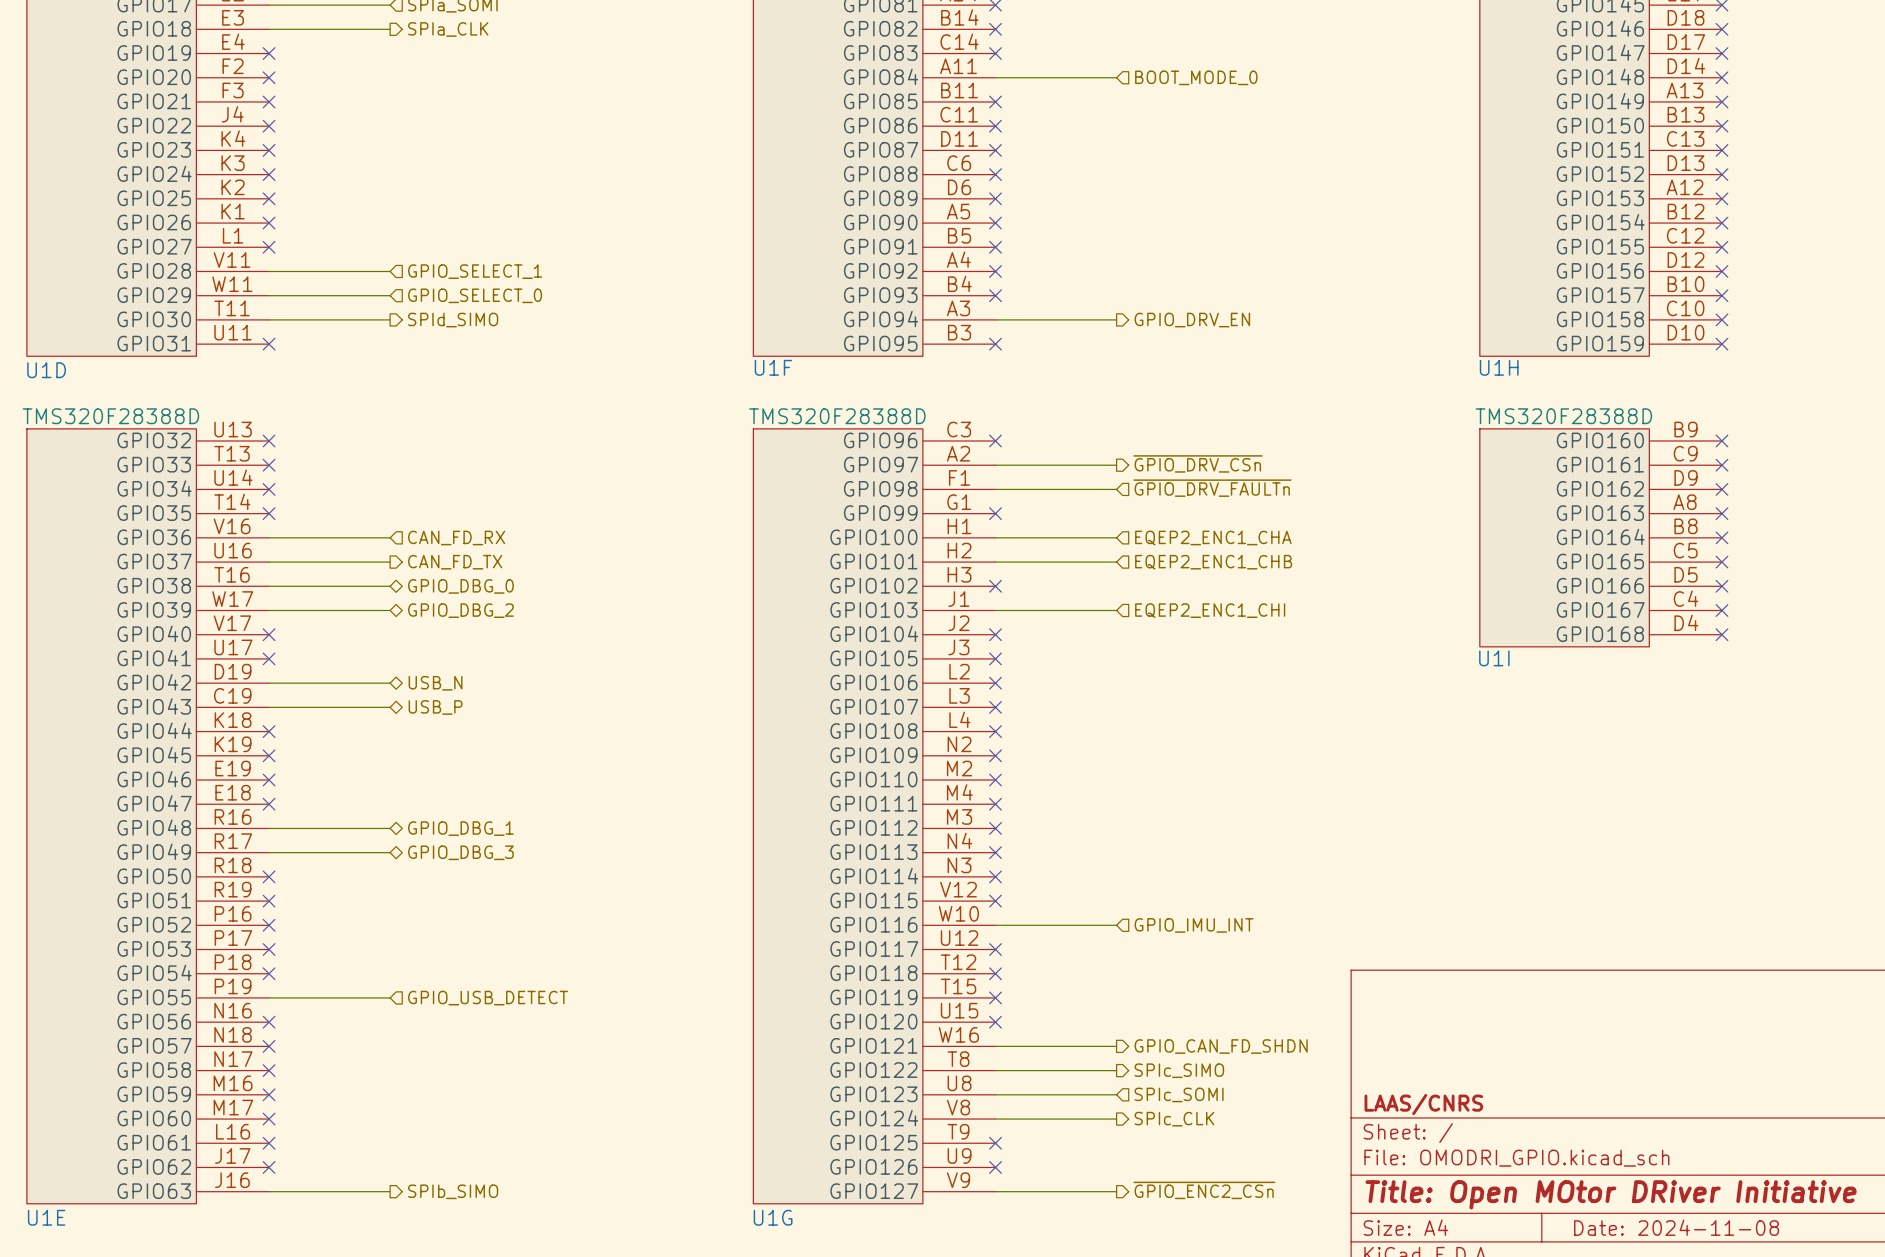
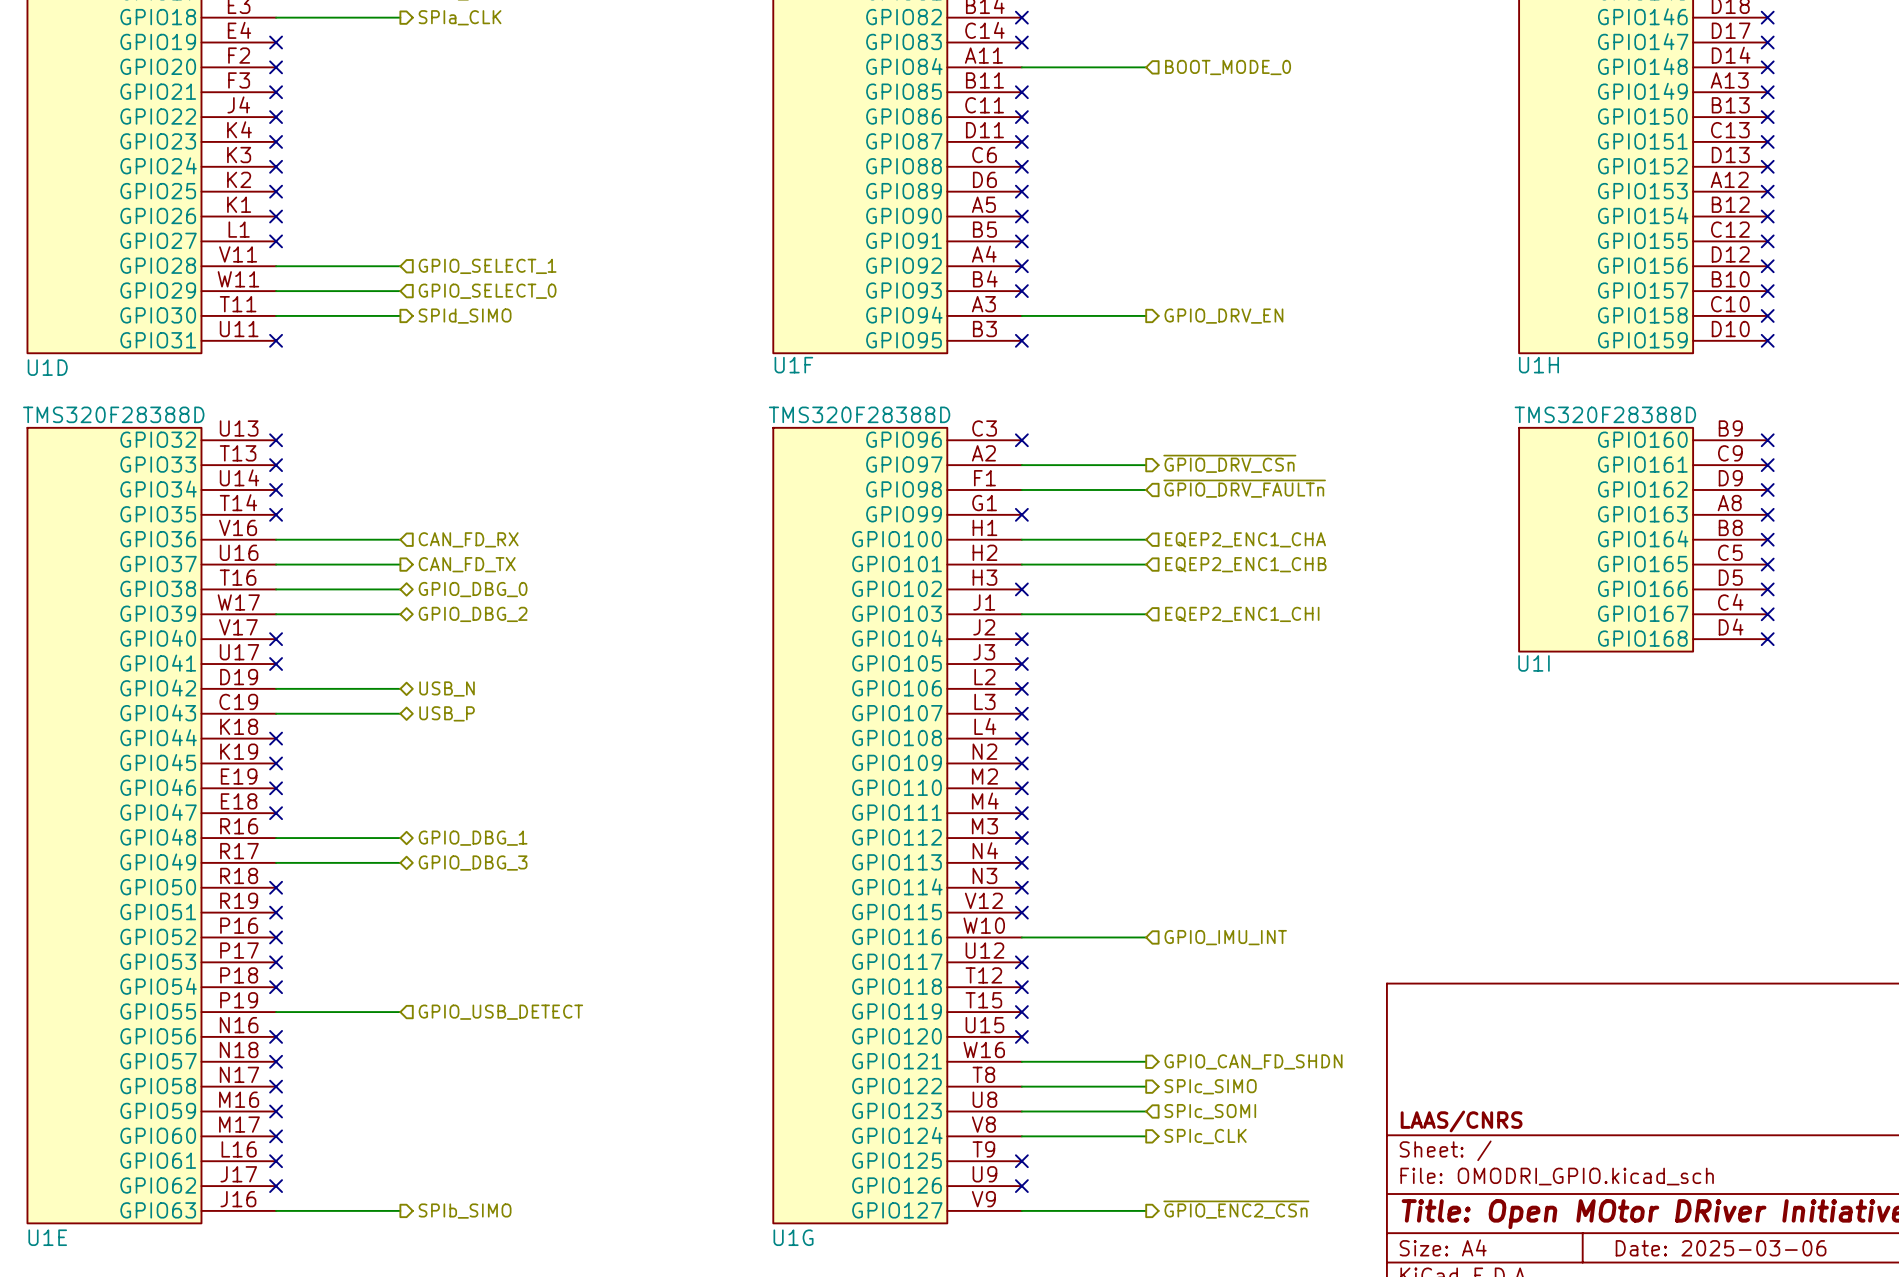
title block: Date: 2024-11-08 (1676, 1227) -> Date: 2025-03-06 (1721, 1248)

